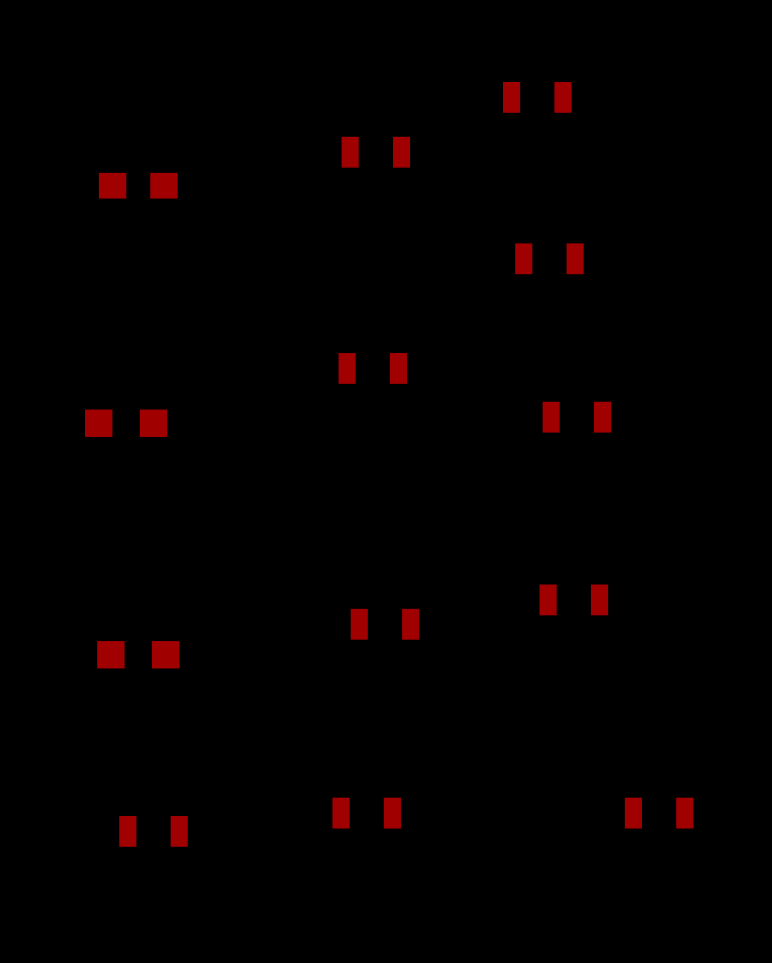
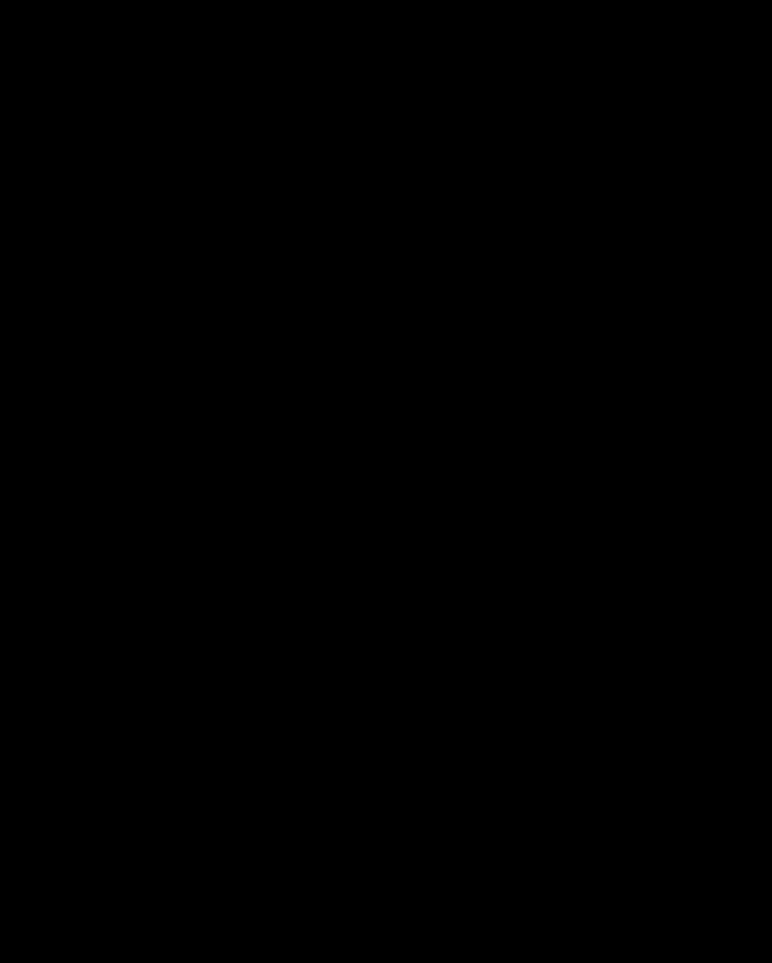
part: (537, 97) -> none
part: (375, 152) -> none
part: (138, 185) -> none
part: (549, 258) -> none
part: (372, 368) -> none
part: (576, 417) -> none
part: (126, 423) -> none
part: (573, 599) -> none
part: (384, 624) -> none
part: (138, 654) -> none
part: (366, 813) -> none
part: (659, 813) -> none
part: (153, 831) -> none

